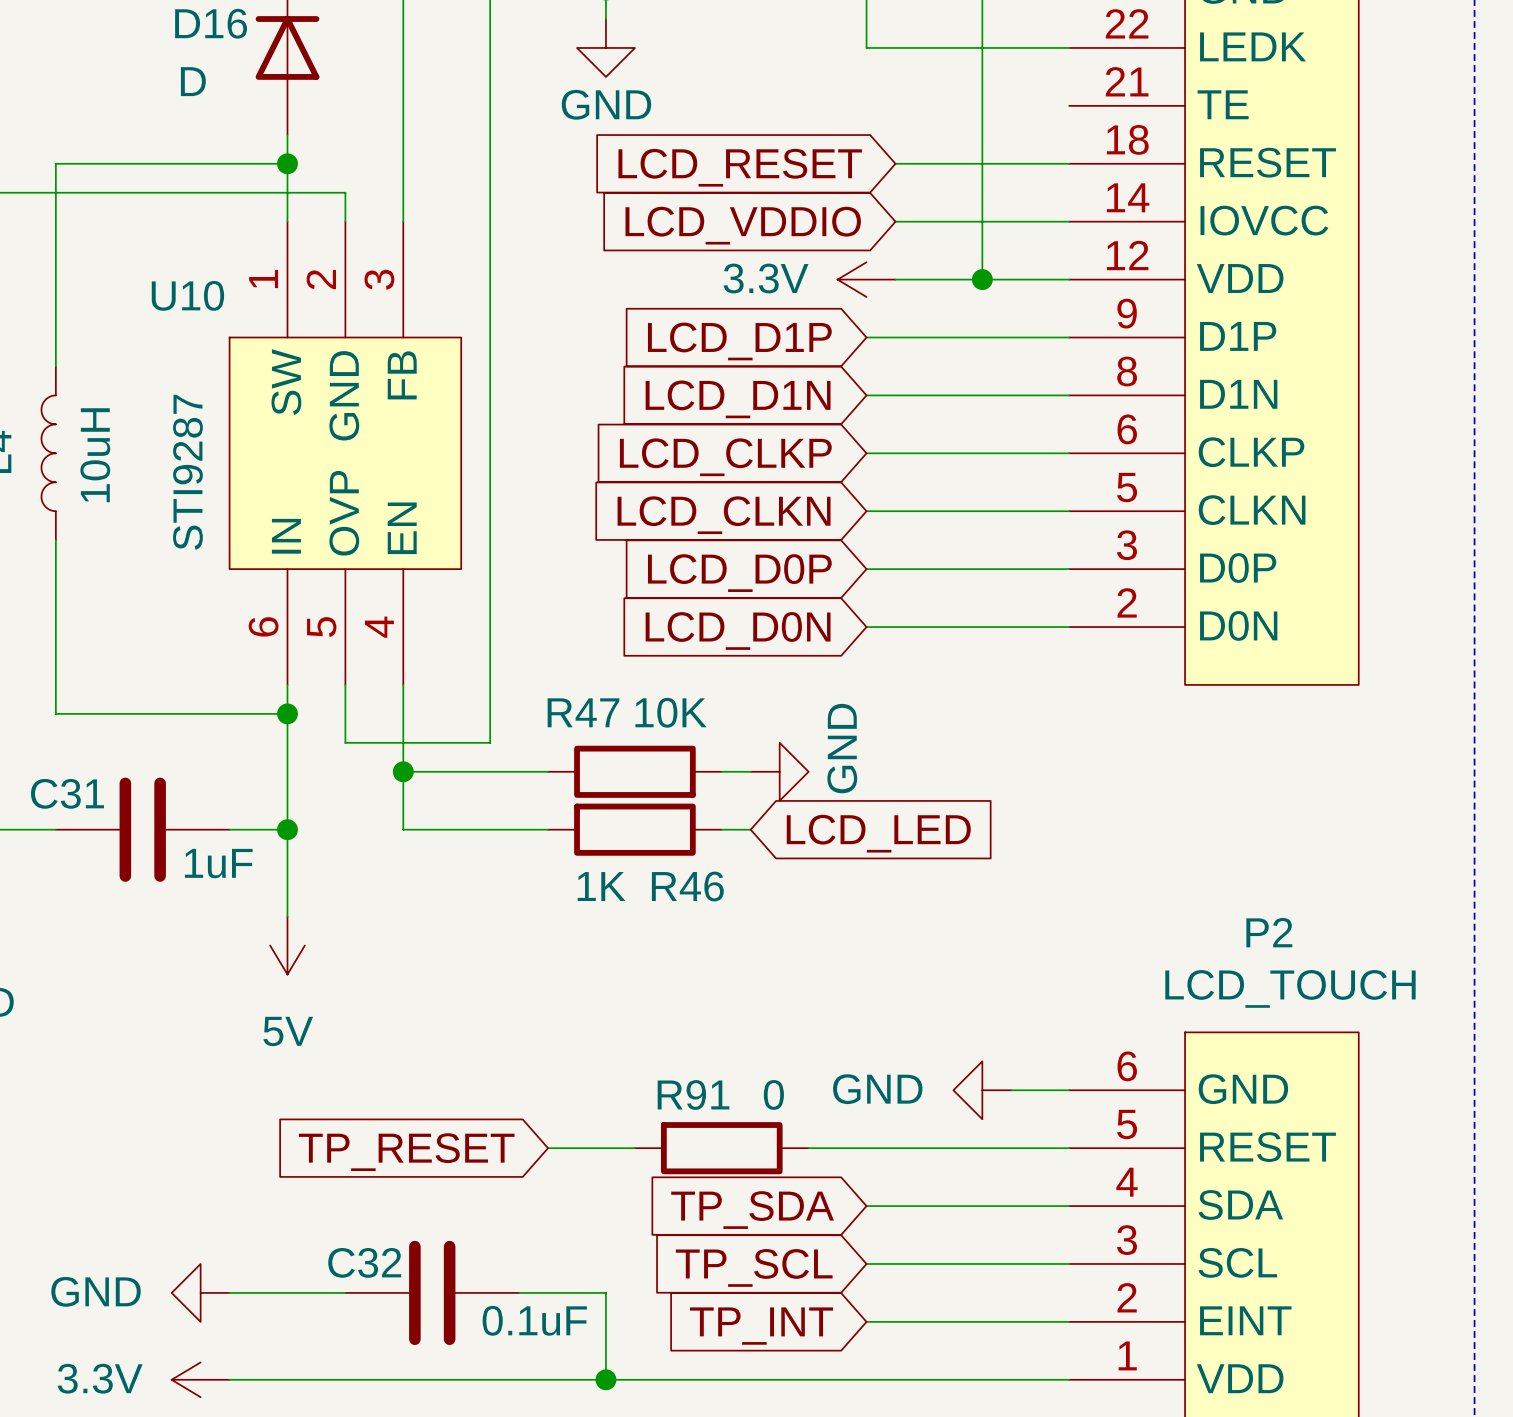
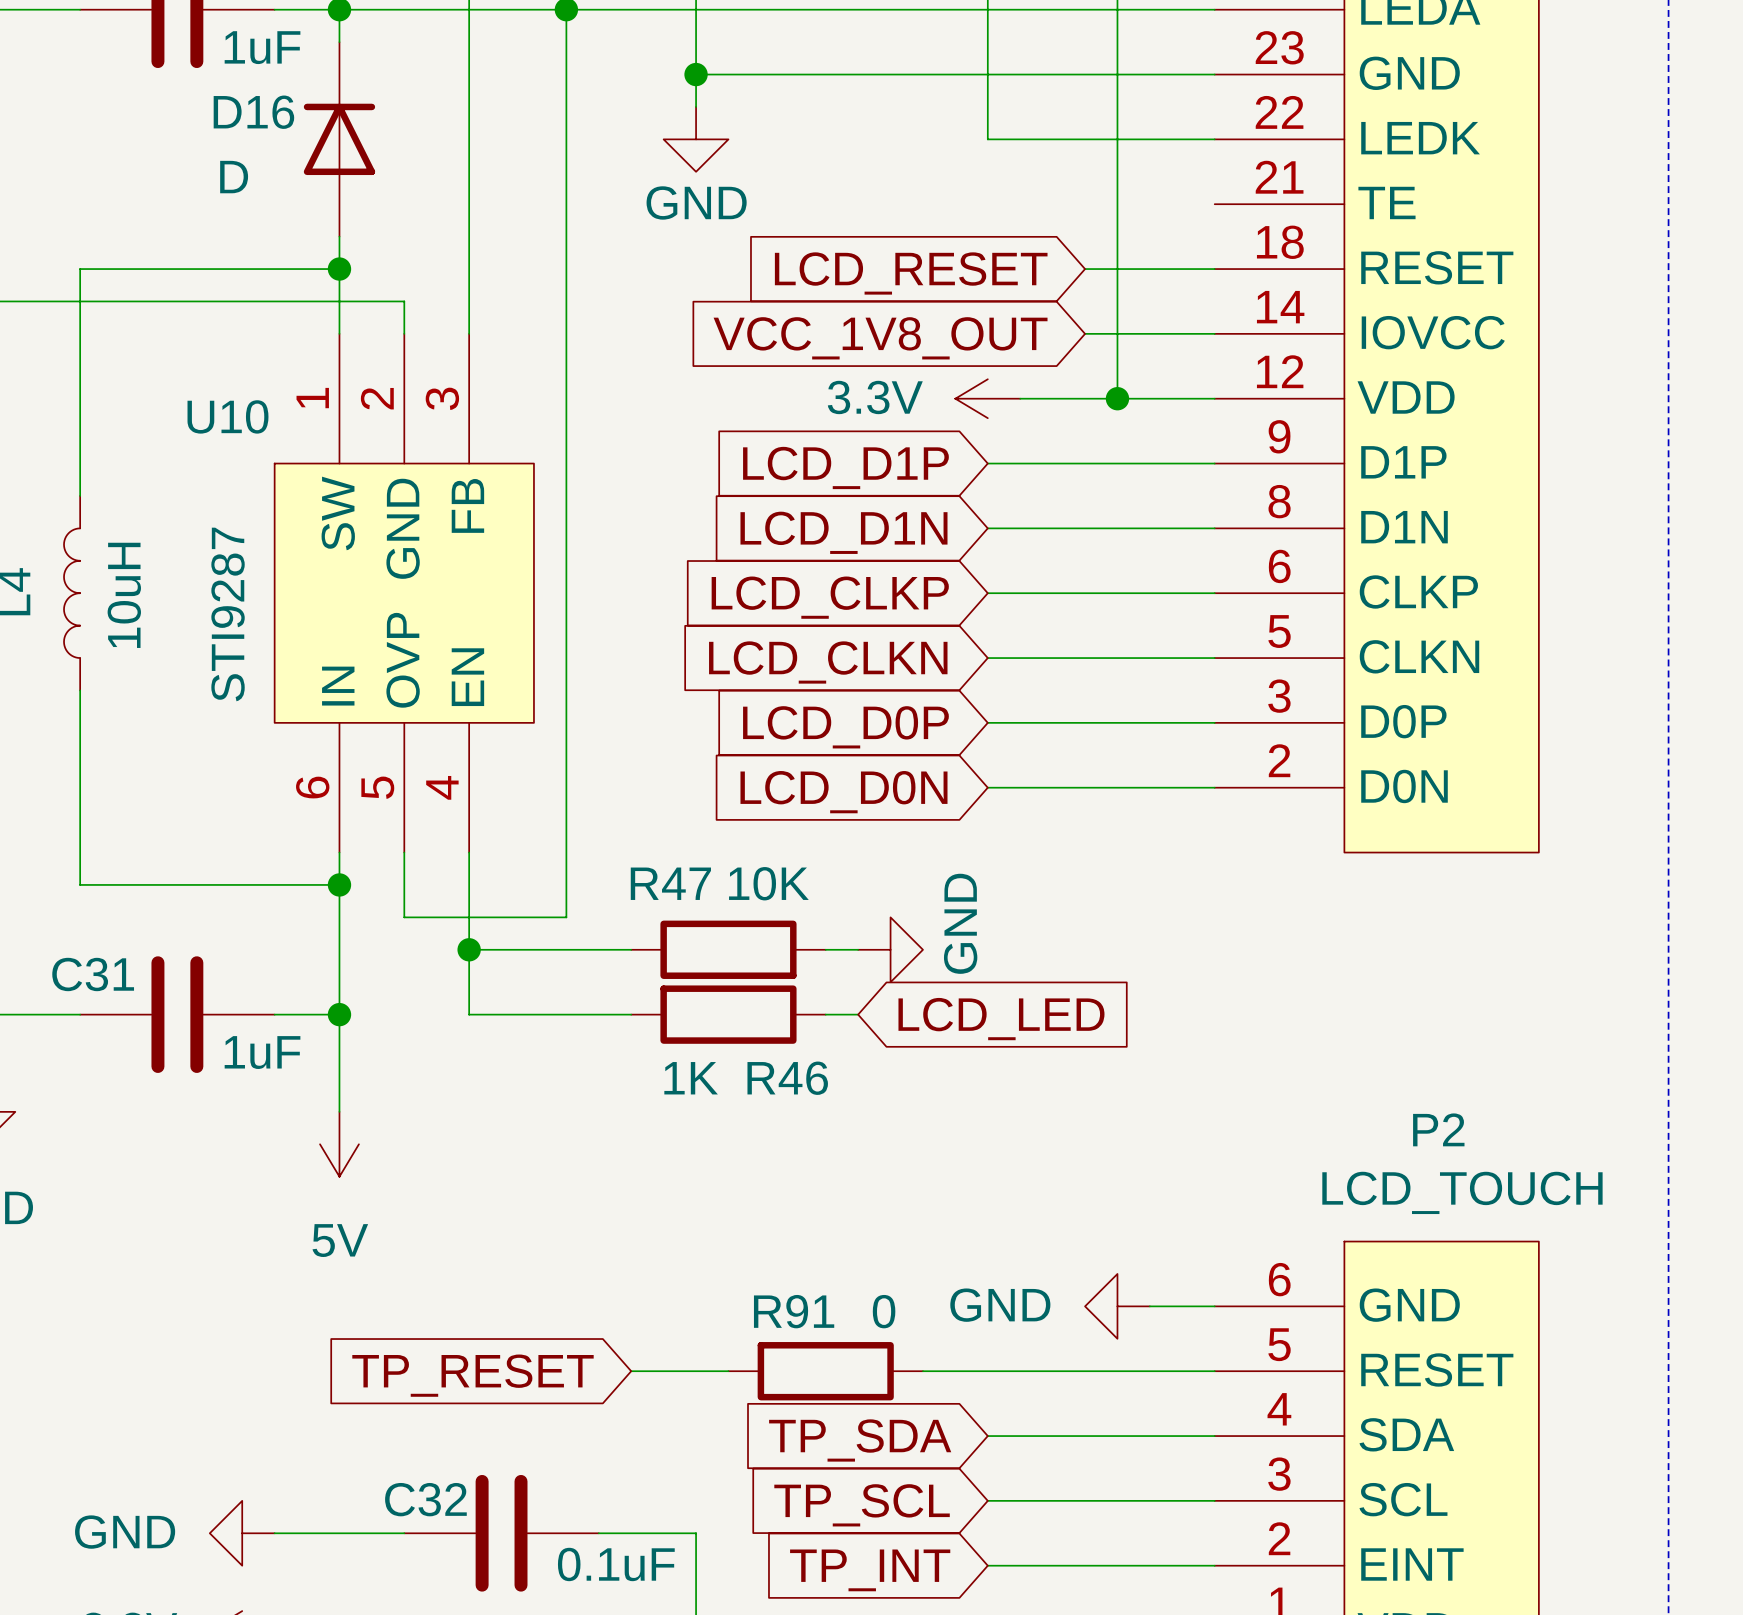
wire: (895, 163) (953, 163) -> none
global label position: LCD_RESET (740, 167) -> LCD_RESET (911, 273)
wire: (895, 221) (953, 221) -> none
global label: LCD_VDDIO (743, 225) -> none
global label: none -> VCC_1V8_OUT (880, 338)

